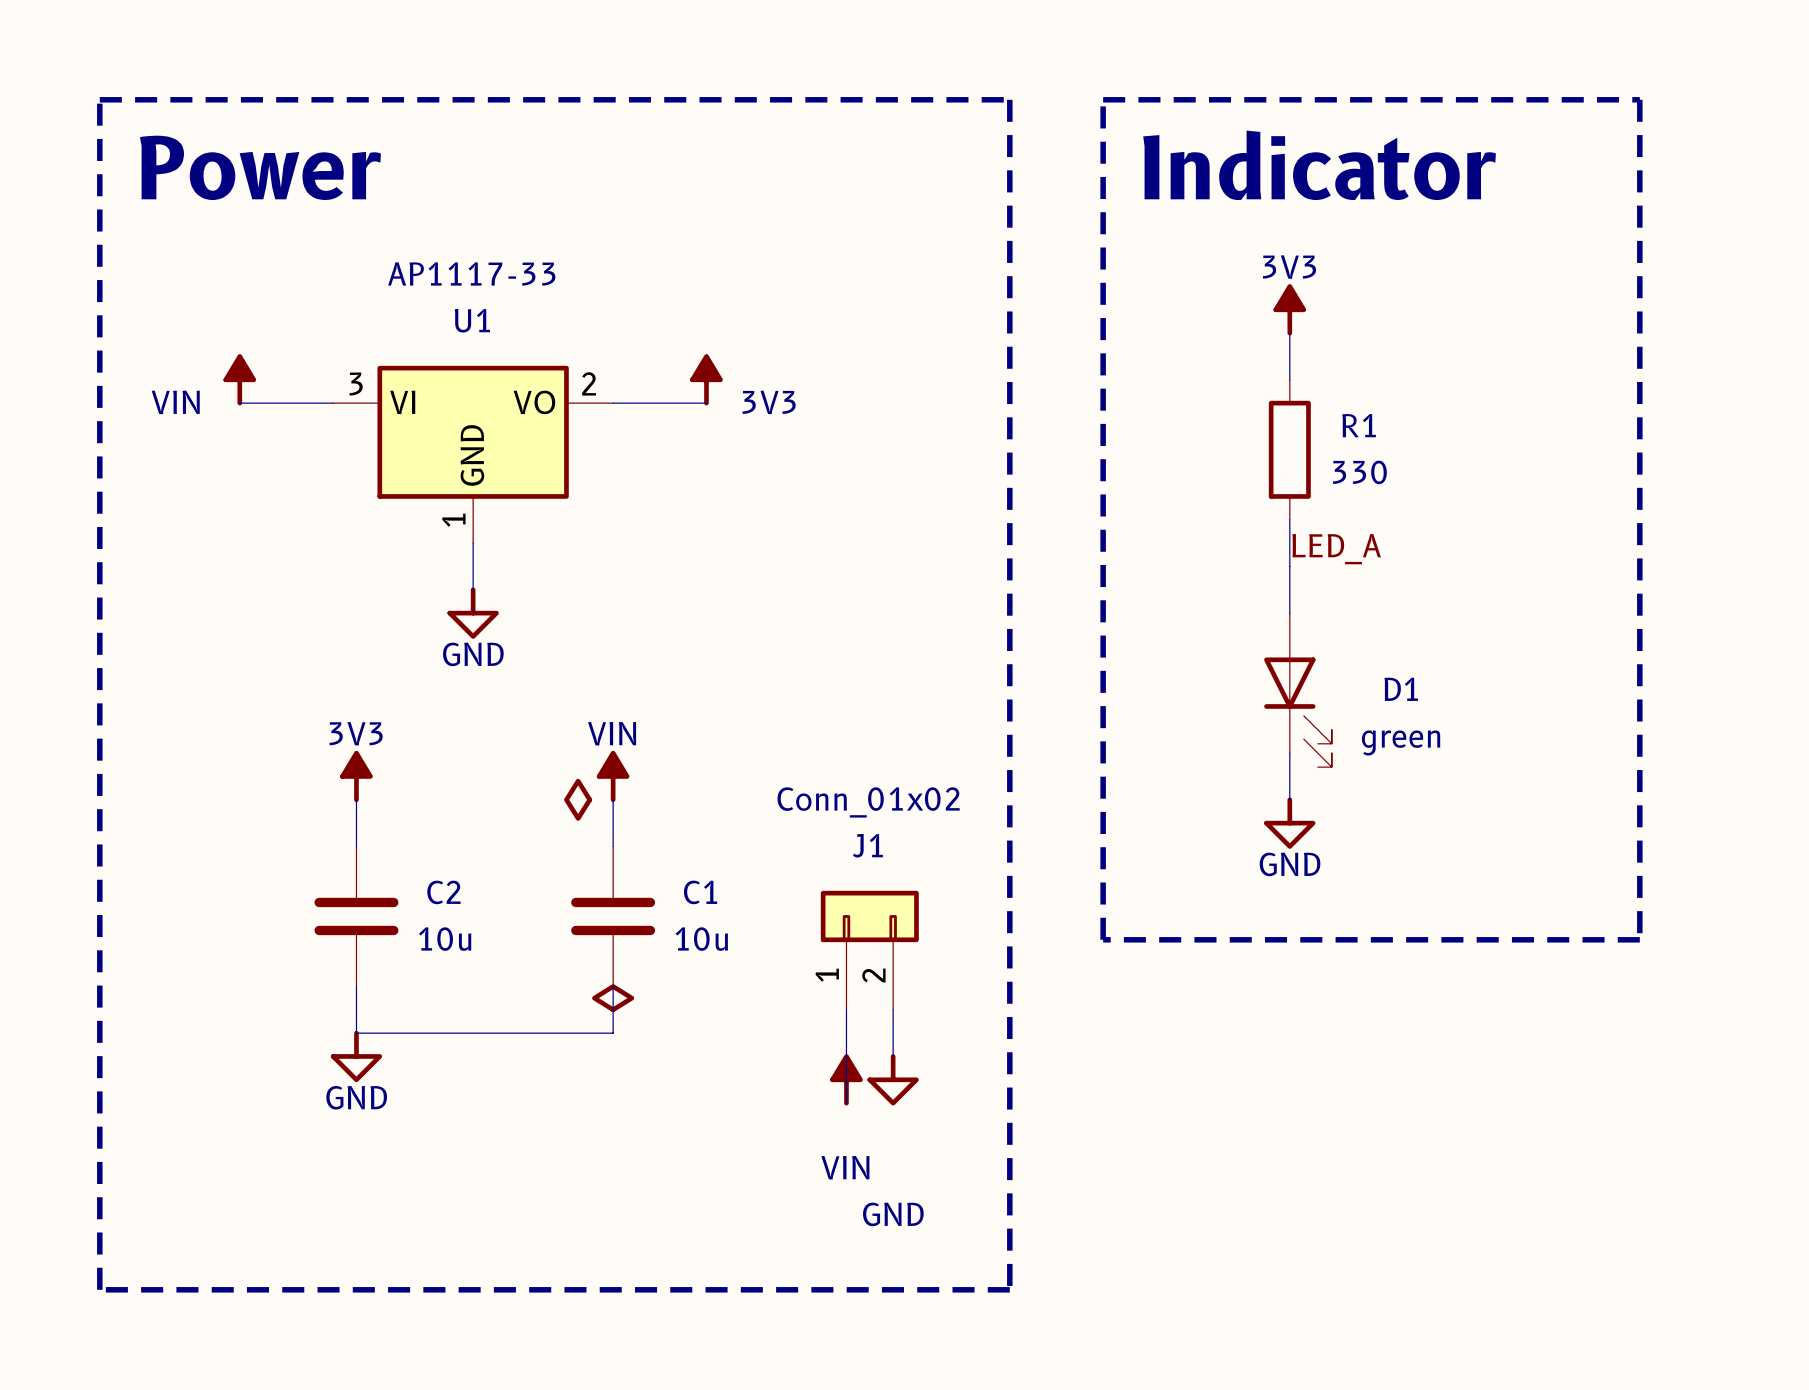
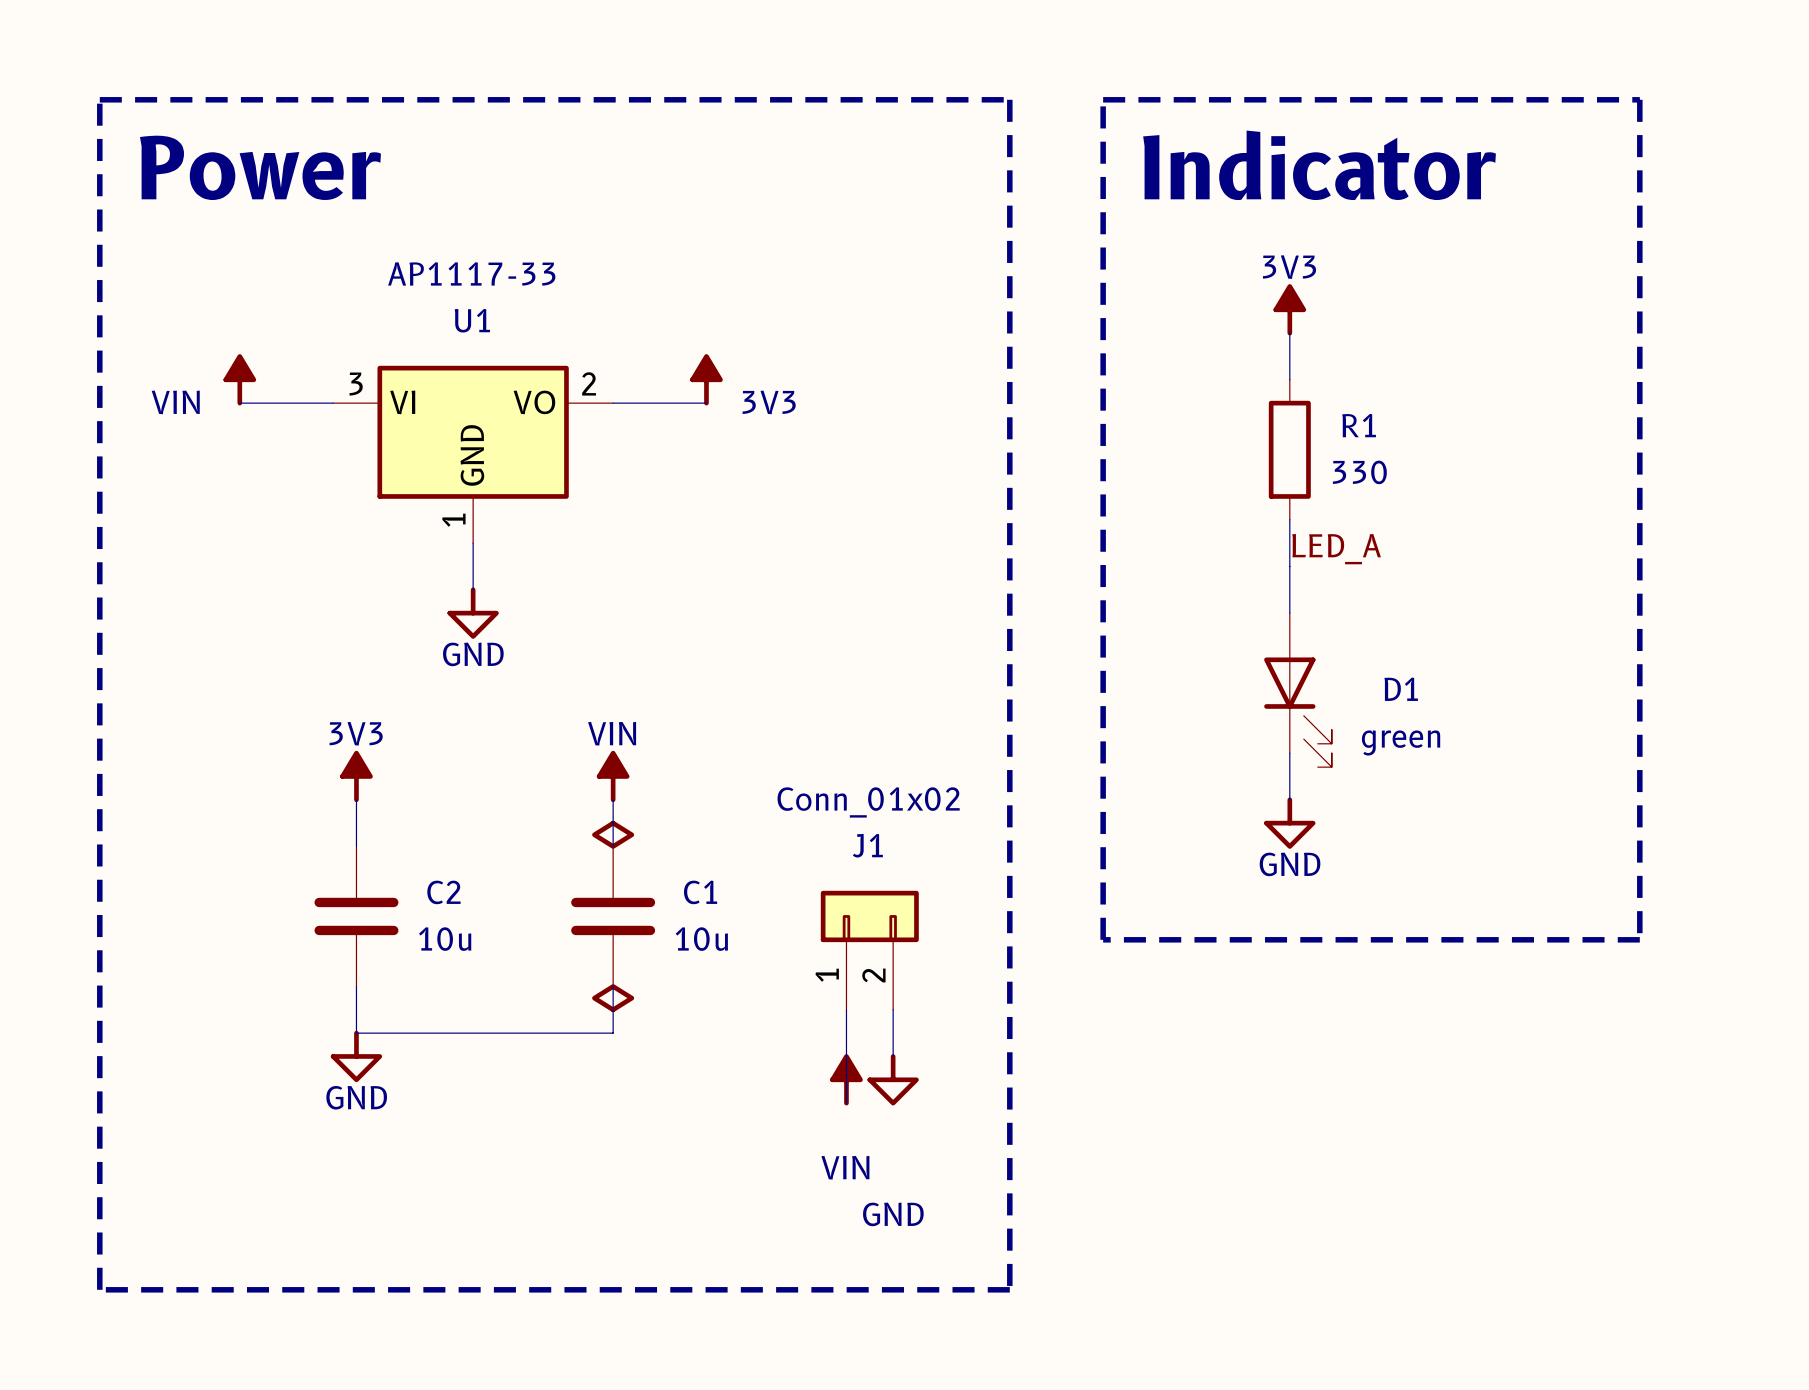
power symbol rotation: 0° (578, 799) -> 90° clockwise (613, 834)
power symbol position: (578, 799) -> (613, 834)

